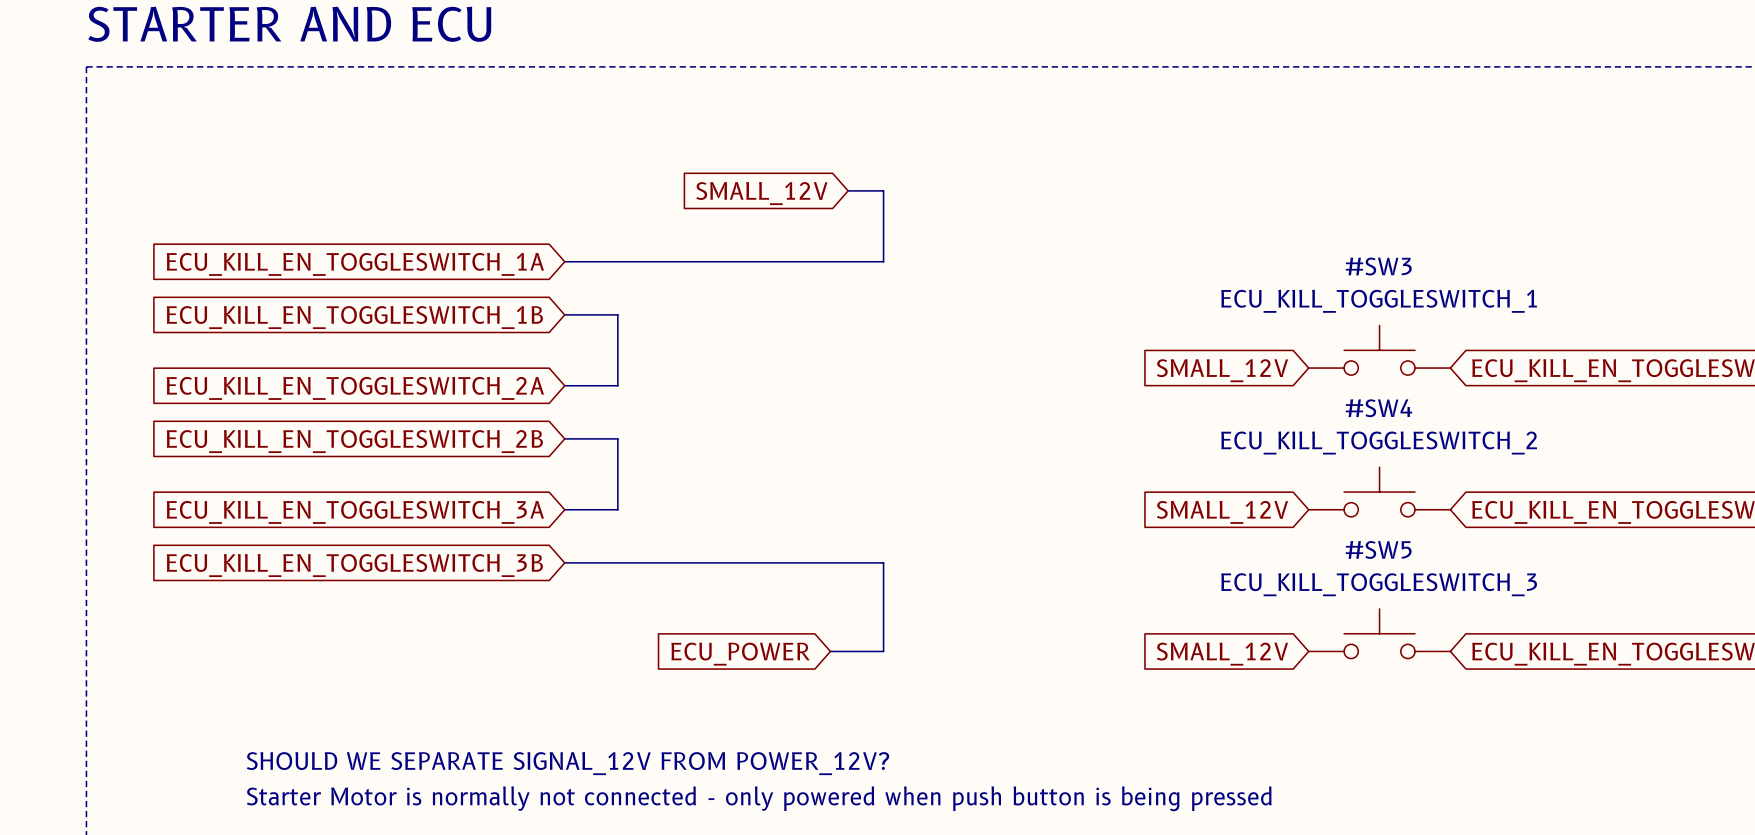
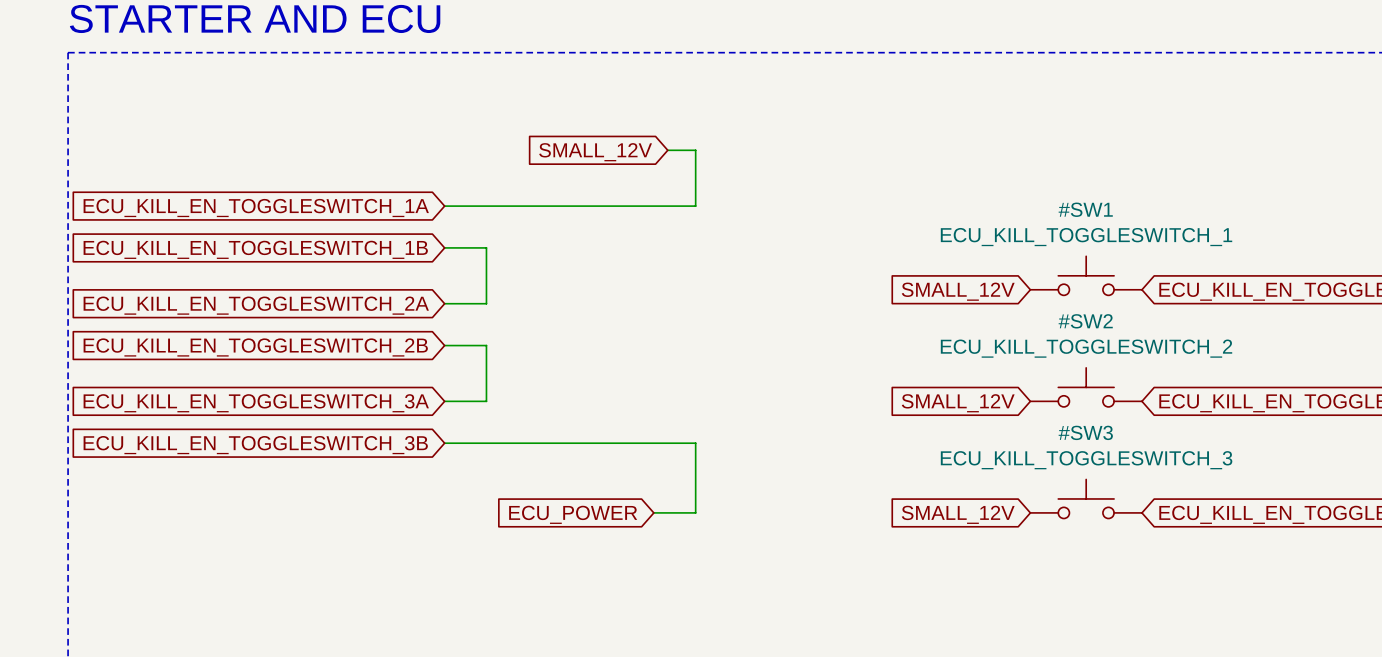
#SW3 name: #SW3 (1378, 266) -> #SW1 (1085, 209)
#SW4 name: #SW4 (1378, 408) -> #SW2 (1085, 321)
#SW5 name: #SW5 (1378, 549) -> #SW3 (1085, 432)
text: SHOULD WE SEPARATE SIGNAL_12V FROM POWER_12V? (567, 763) -> none
text: Starter Motor is normally not connected - only powered when push button is being pressed (759, 798) -> none

